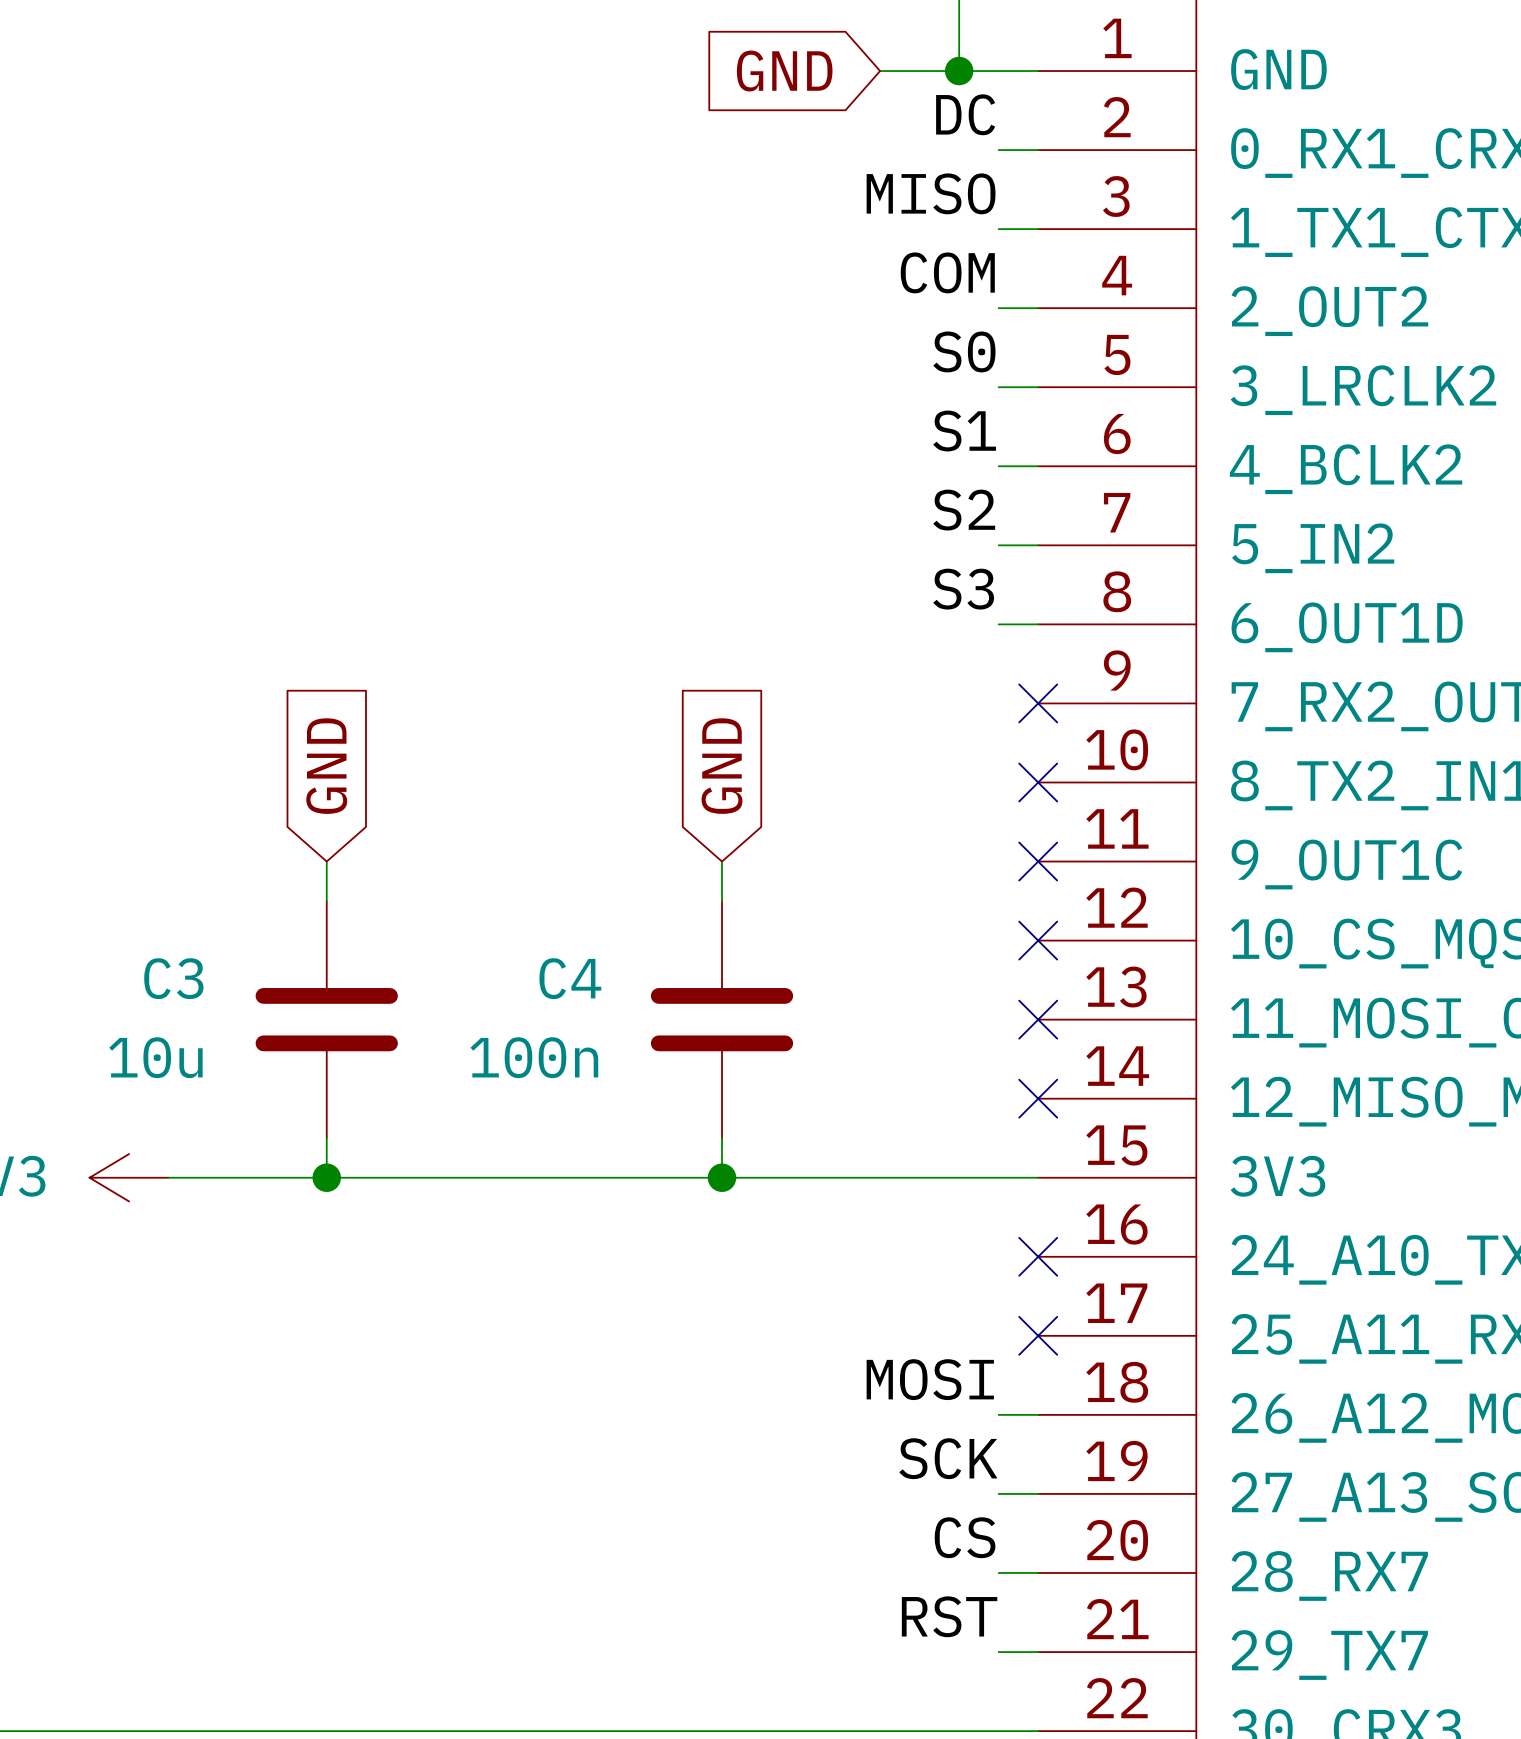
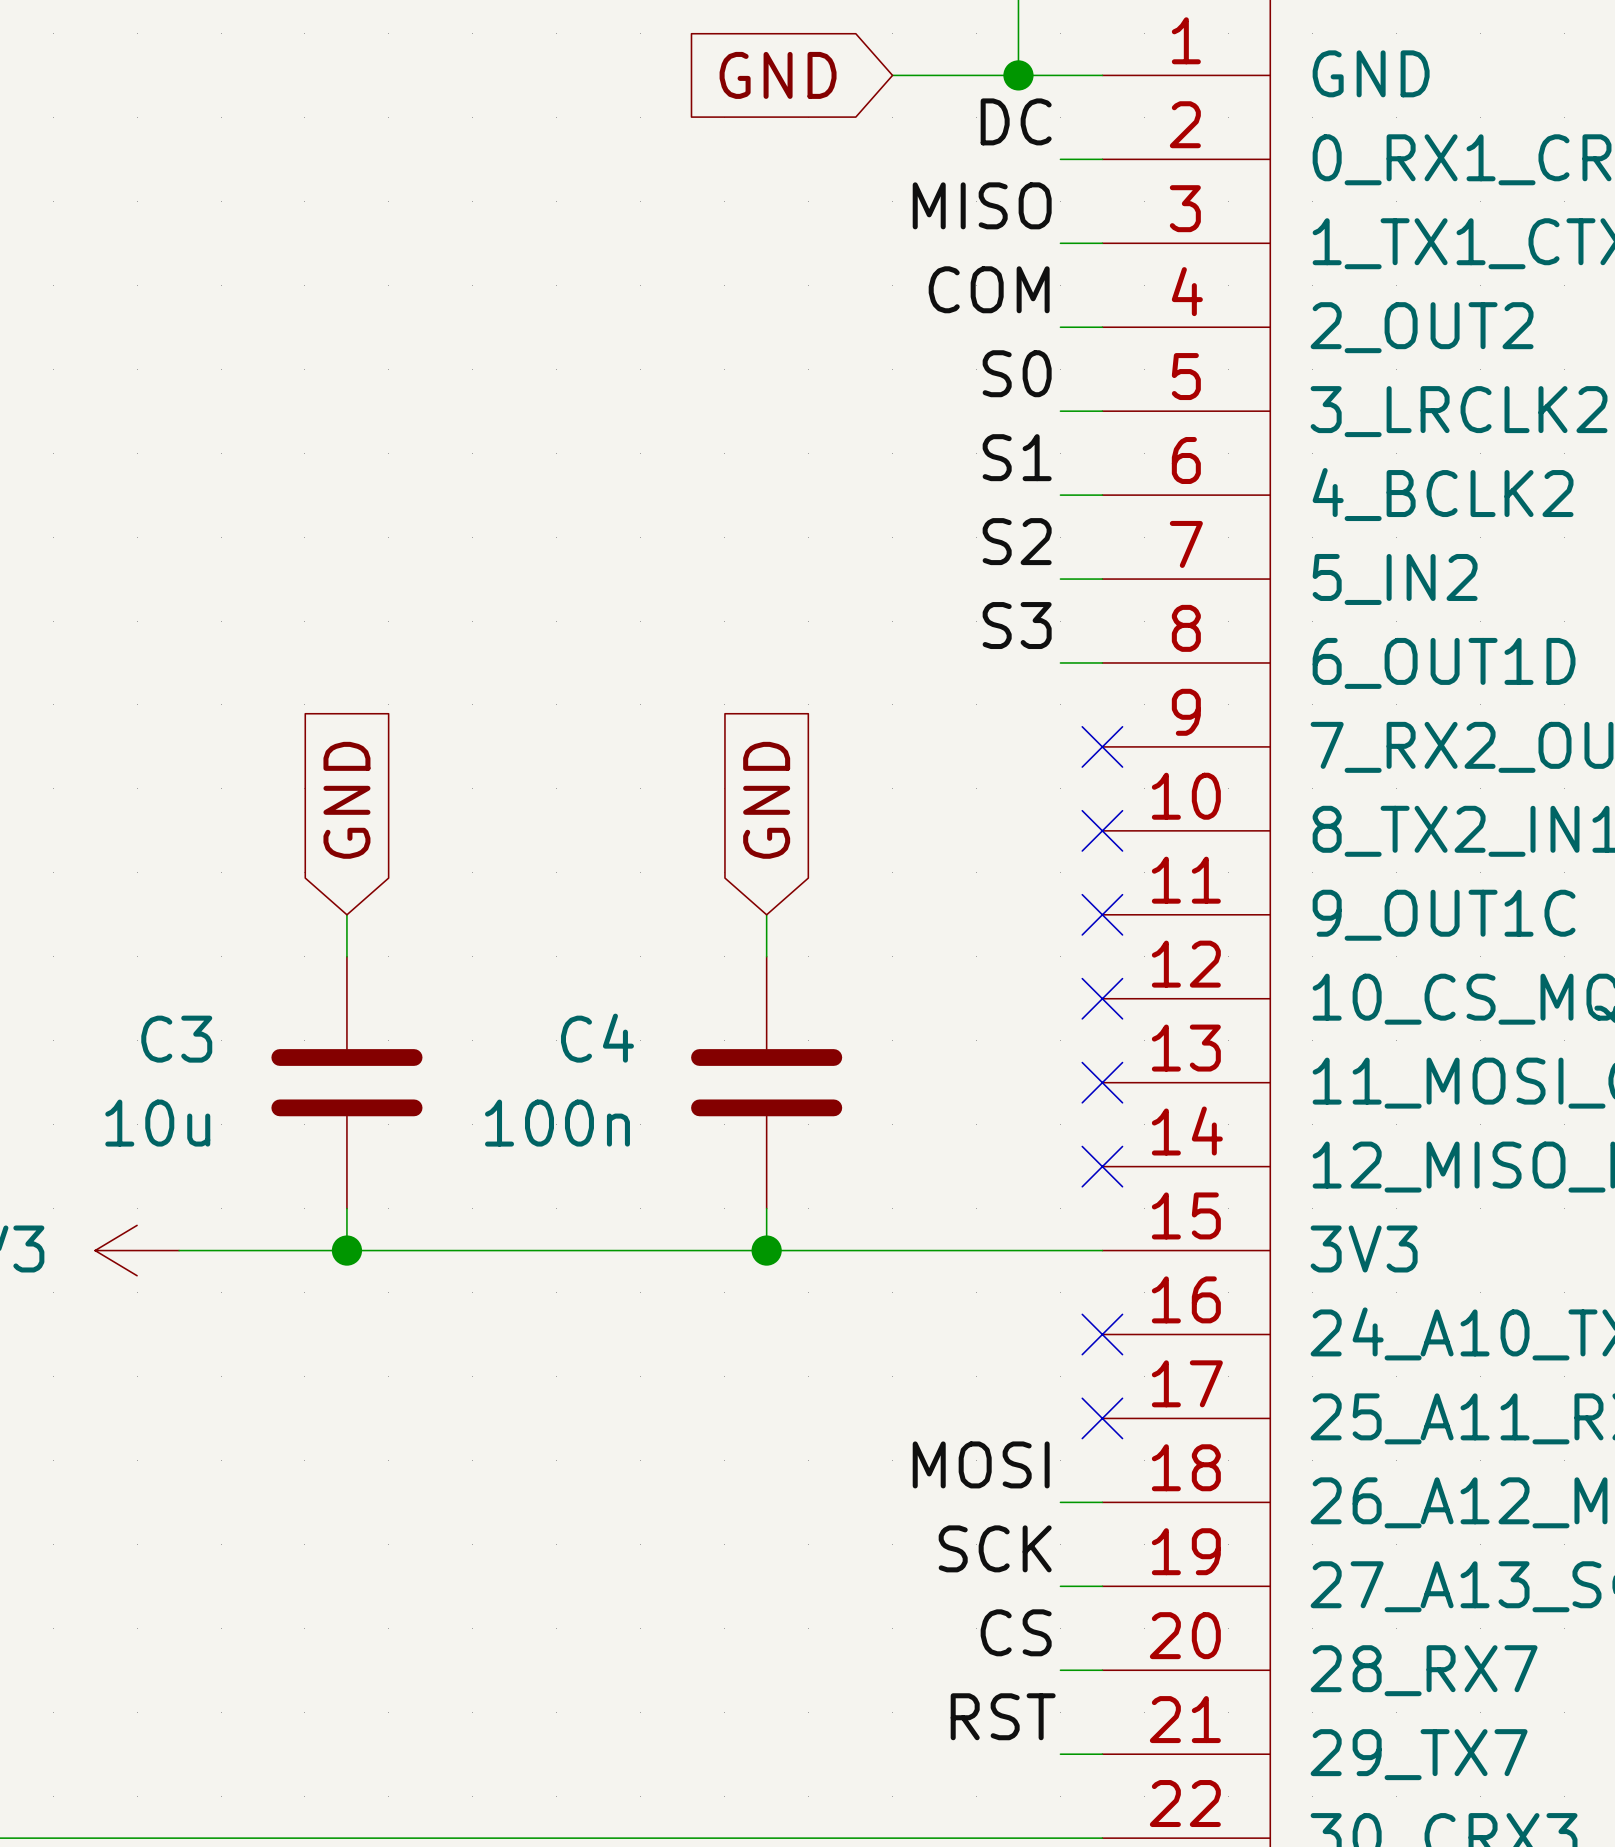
global label position: GND (784, 71) -> GND (778, 75)
wire: none -> (892, 75) (934, 75)

